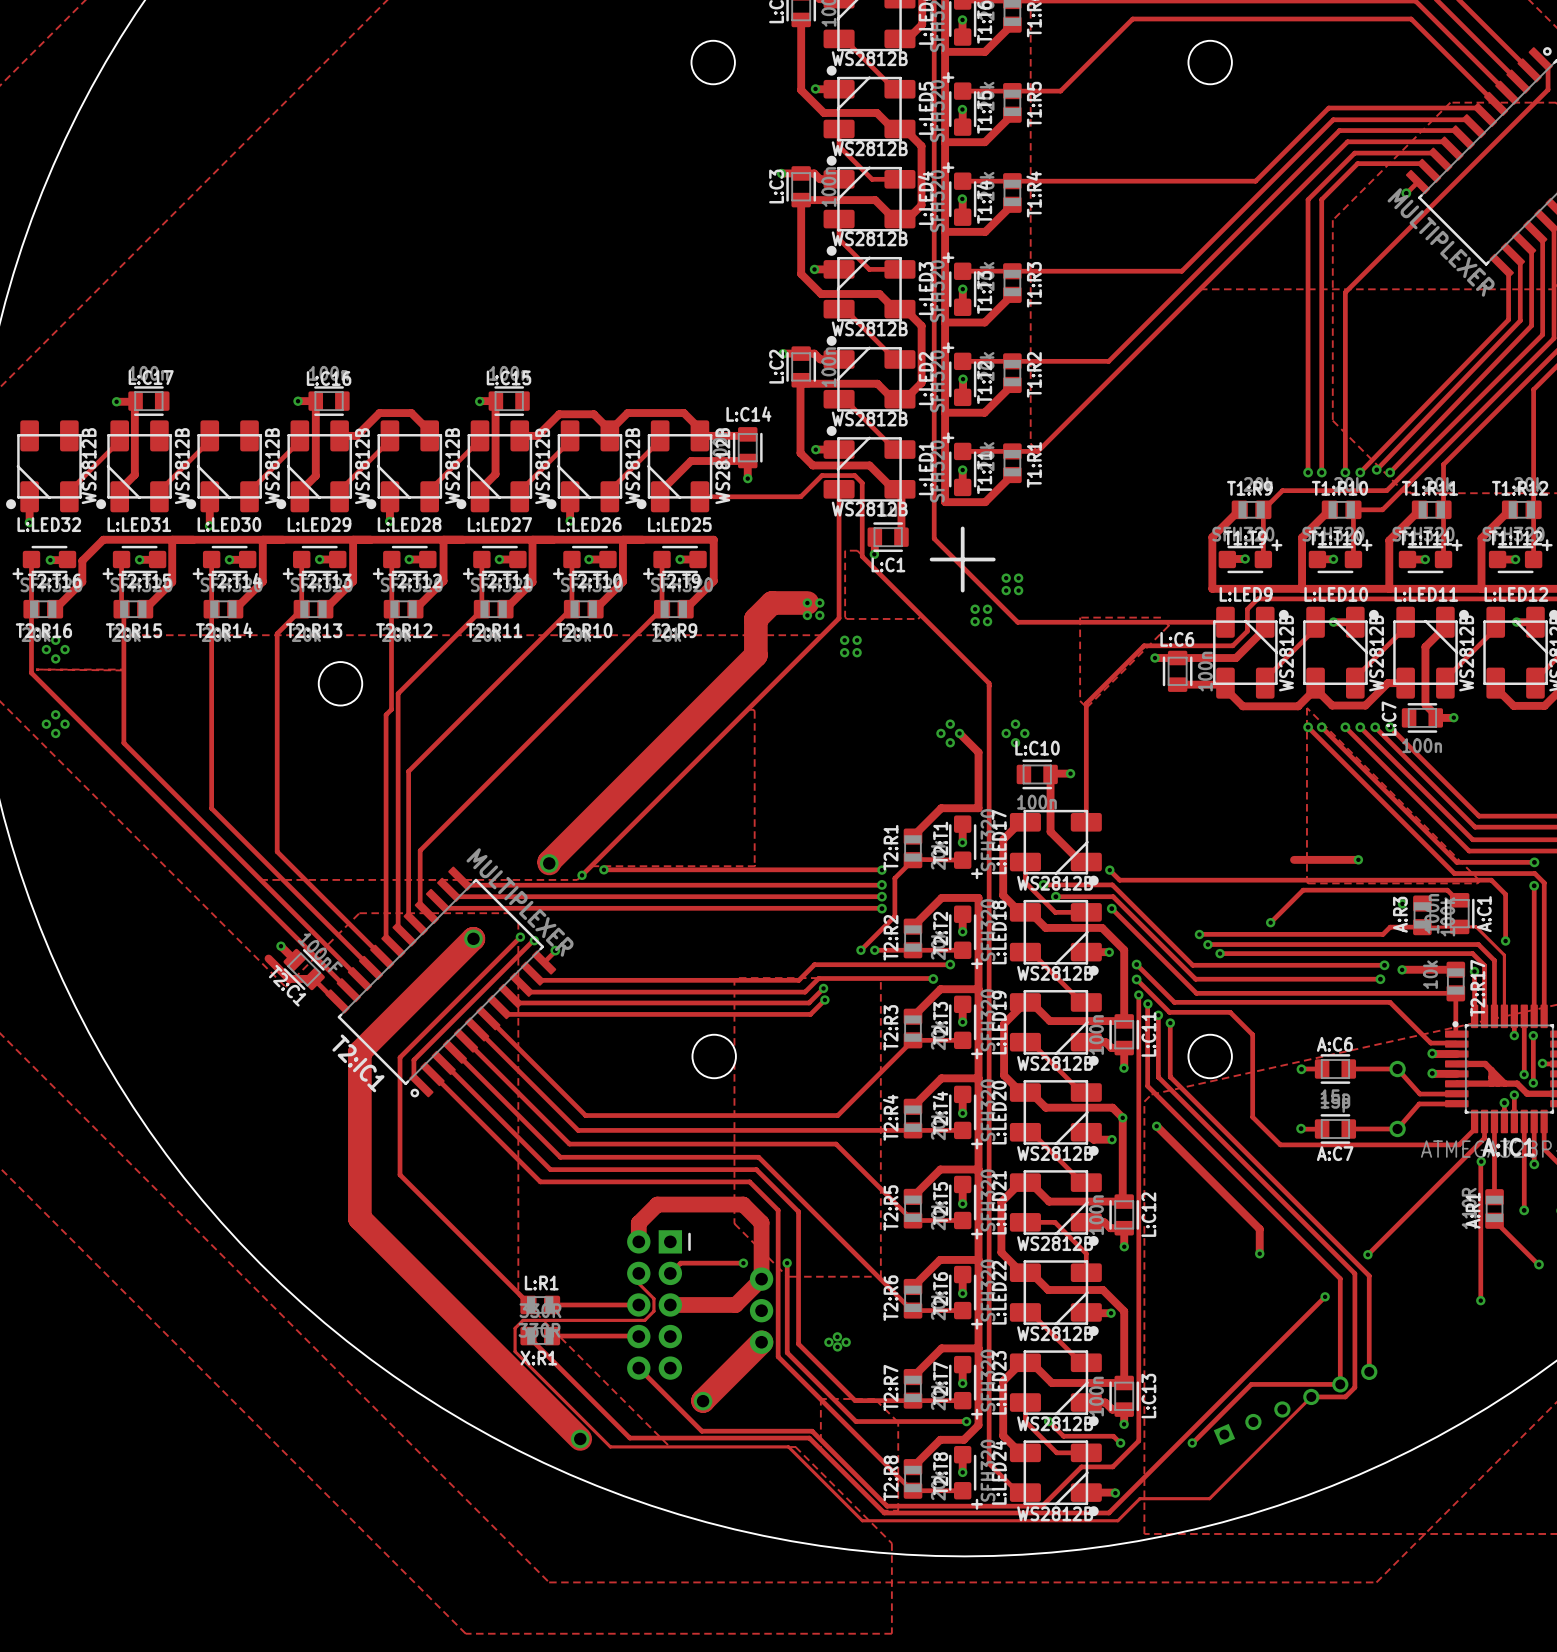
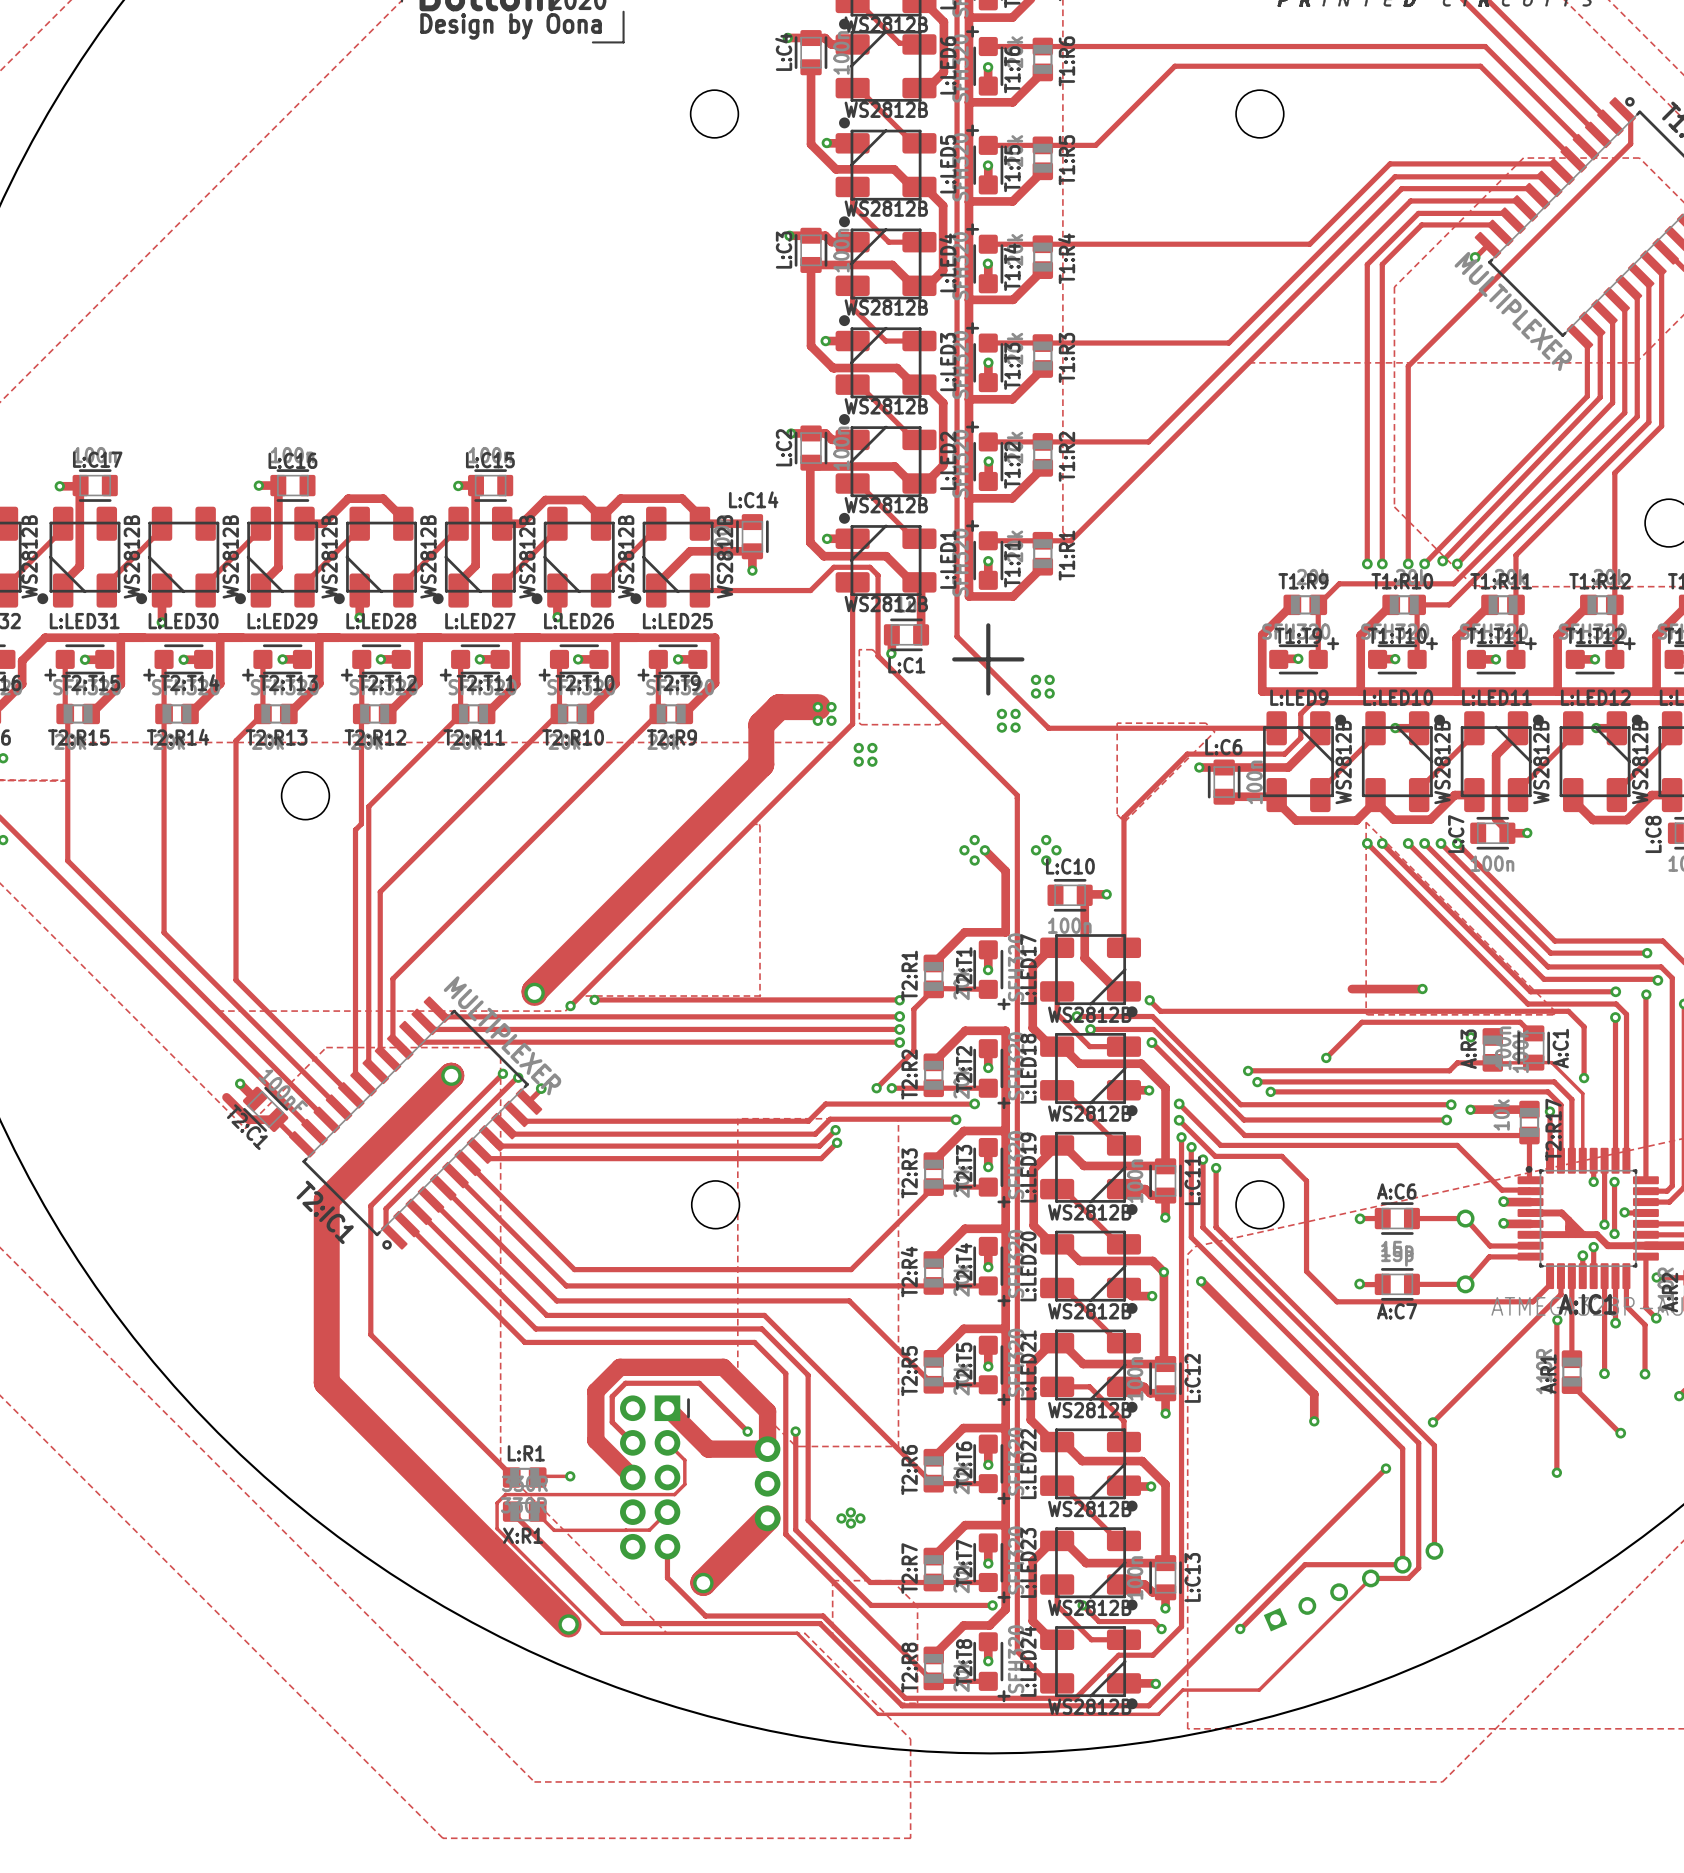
track: (657, 1204) (638, 1223) (638, 1241) -> (653, 1367) (619, 1367) (595, 1391) (595, 1440) (632, 1477)
track: (721, 1204) (743, 1204) (761, 1222) (761, 1244) -> (723, 1367) (767, 1411)
track: (743, 1263) (680, 1263) (670, 1273) -> (747, 1431) (699, 1383) (625, 1383) (612, 1396) (612, 1422) (632, 1442)
track: (638, 1273) (638, 1283) (653, 1298) (653, 1311) (644, 1320) (522, 1320) -> (667, 1442) (684, 1460) (684, 1484) (674, 1494) (505, 1494)
track: (761, 1279) (735, 1304) (670, 1304) -> (767, 1449) (708, 1449) (667, 1408)
via: none -> (570, 1476)
track: (552, 1304) (638, 1304) -> (537, 1477) (570, 1476)
track: (552, 1336) (638, 1336) -> (537, 1511) (554, 1530) (625, 1530)
track: none -> (667, 1512) (649, 1530) (625, 1530)
track: (638, 1368) (701, 1431) (705, 1431) -> (667, 1546) (667, 1577) (705, 1616)

